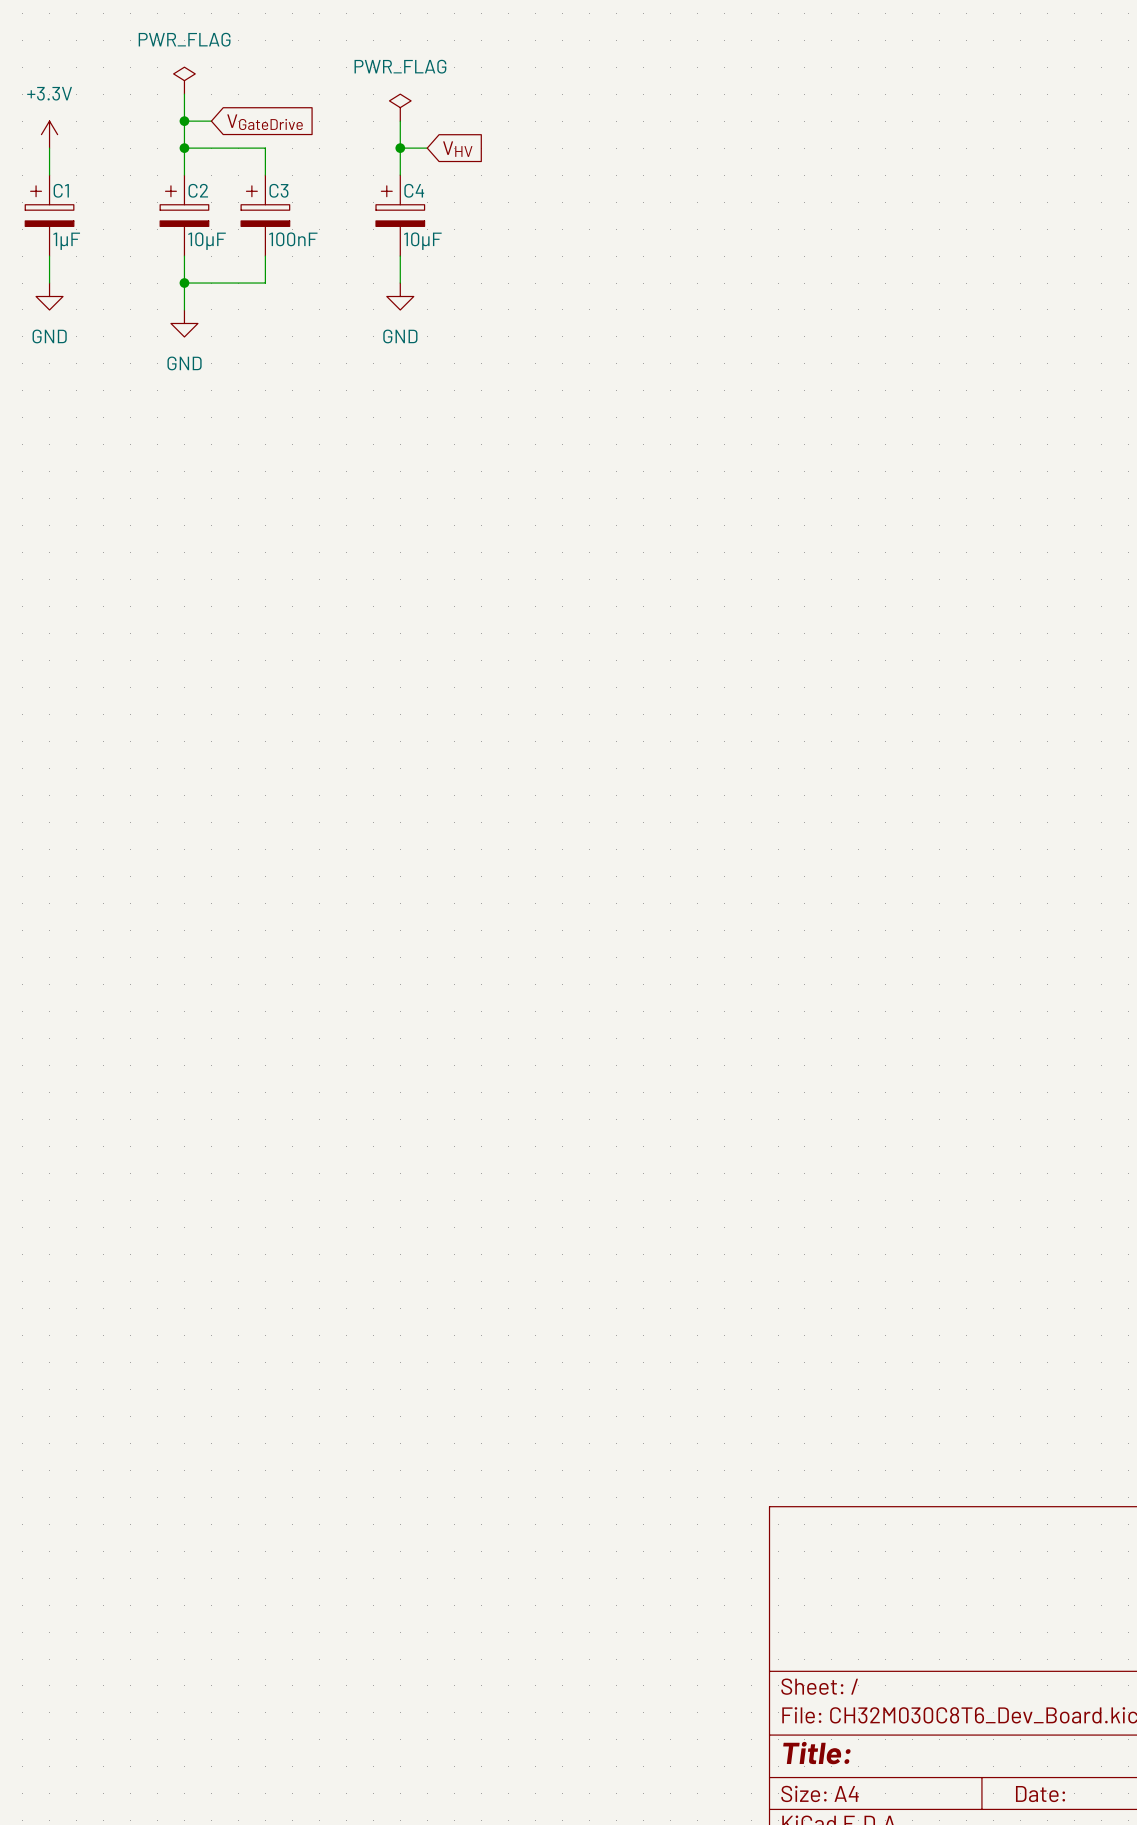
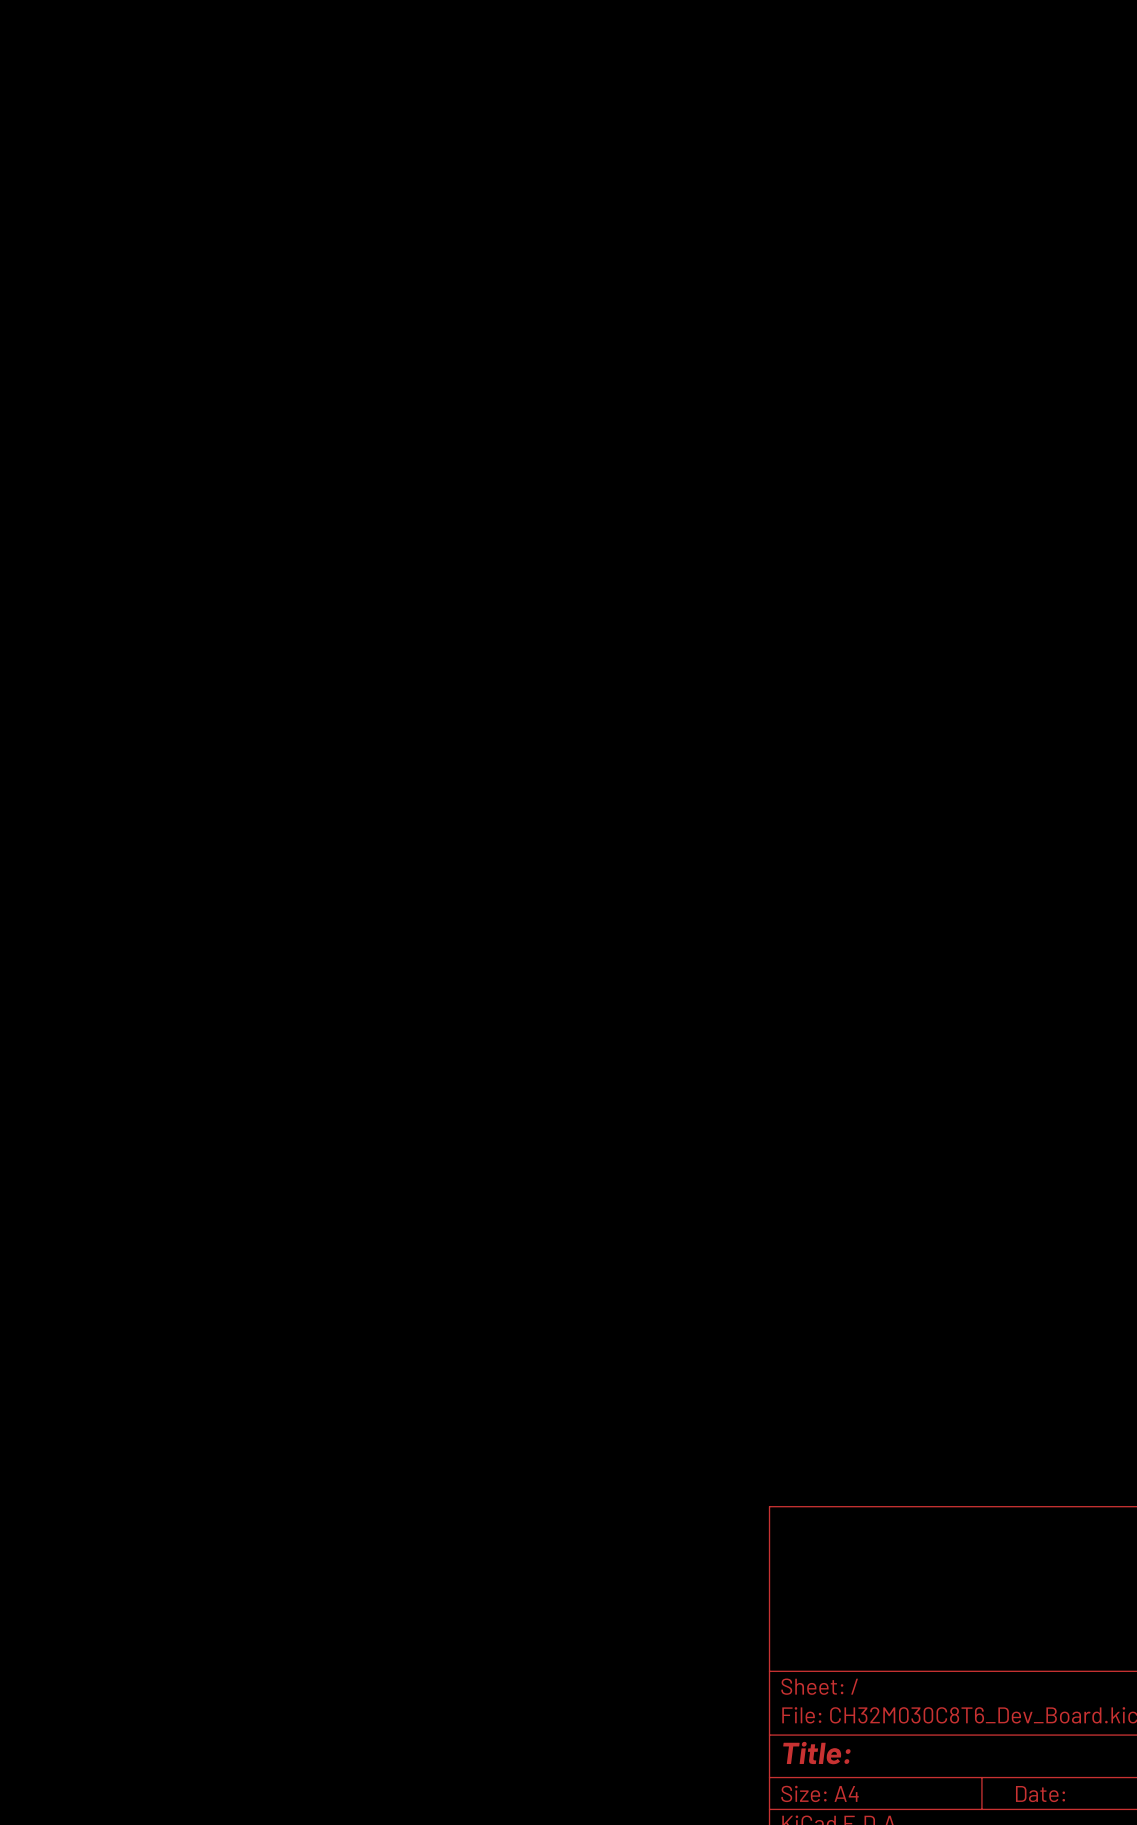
power symbol: PWR_FLAG (184, 80) -> none
wire: (184, 94) (184, 175) -> none
power symbol: PWR_FLAG (400, 107) -> none
wire: (184, 121) (211, 121) -> none
junction: (184, 121) -> none
wire: (400, 121) (400, 175) -> none
global label: VGateDrive (265, 122) -> none
power symbol: +3.3V (49, 134) -> none
wire: (49, 148) (49, 175) -> none
wire: (184, 148) (265, 148) (265, 175) -> none
junction: (184, 148) -> none
wire: (400, 148) (427, 148) -> none
junction: (400, 148) -> none
global label: VHV (457, 149) -> none
C1: 1μF (49, 215) -> none
C2: 10μF (184, 215) -> none
C3: 100nF (265, 215) -> none
C4: 10μF (400, 215) -> none
wire: (49, 256) (49, 283) -> none
wire: (184, 256) (184, 309) -> none
wire: (265, 256) (265, 283) (184, 283) -> none
wire: (400, 256) (400, 283) -> none
junction: (184, 283) -> none
power symbol: GND (49, 296) -> none
power symbol: GND (400, 296) -> none
power symbol: GND (184, 323) -> none

